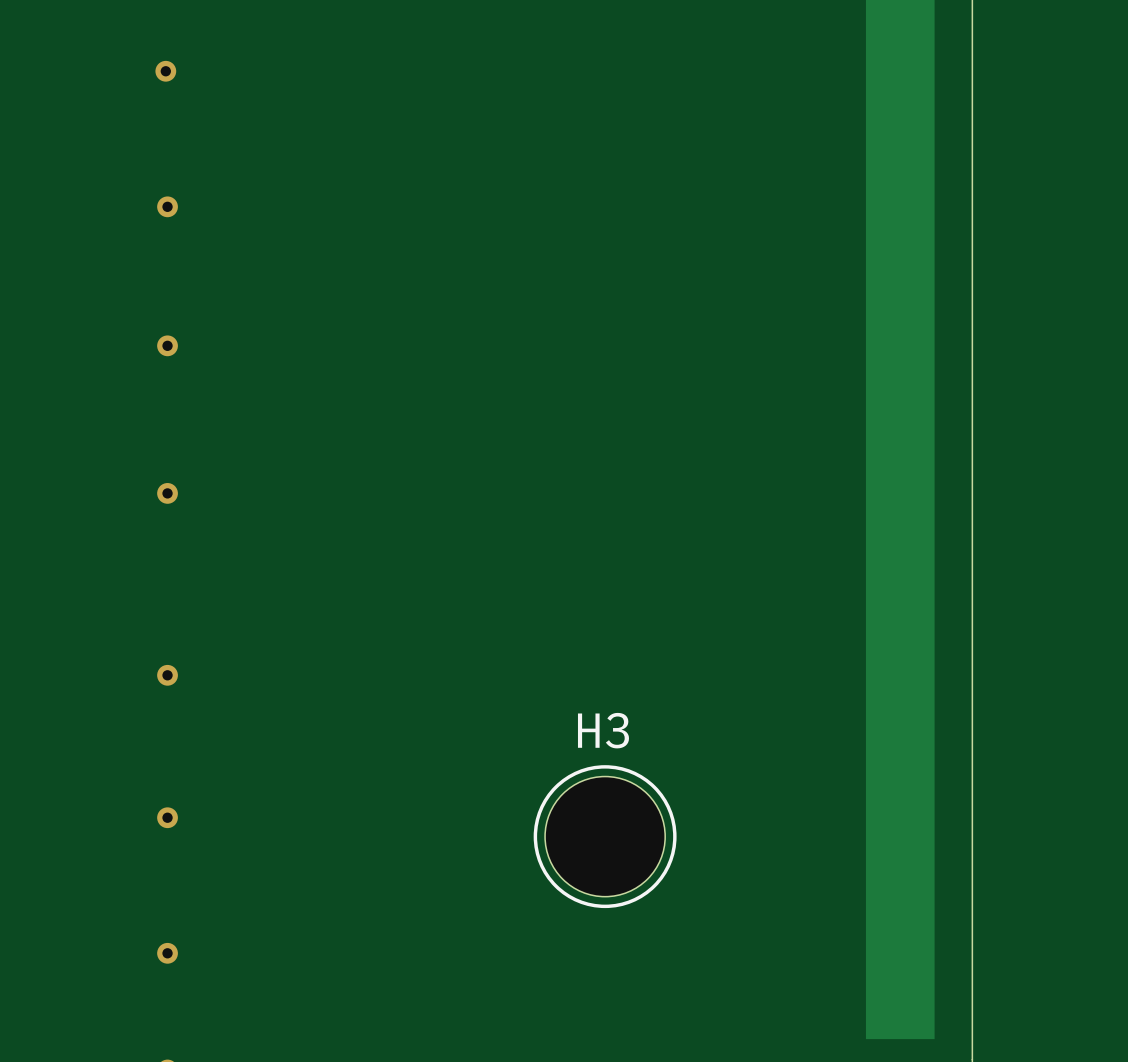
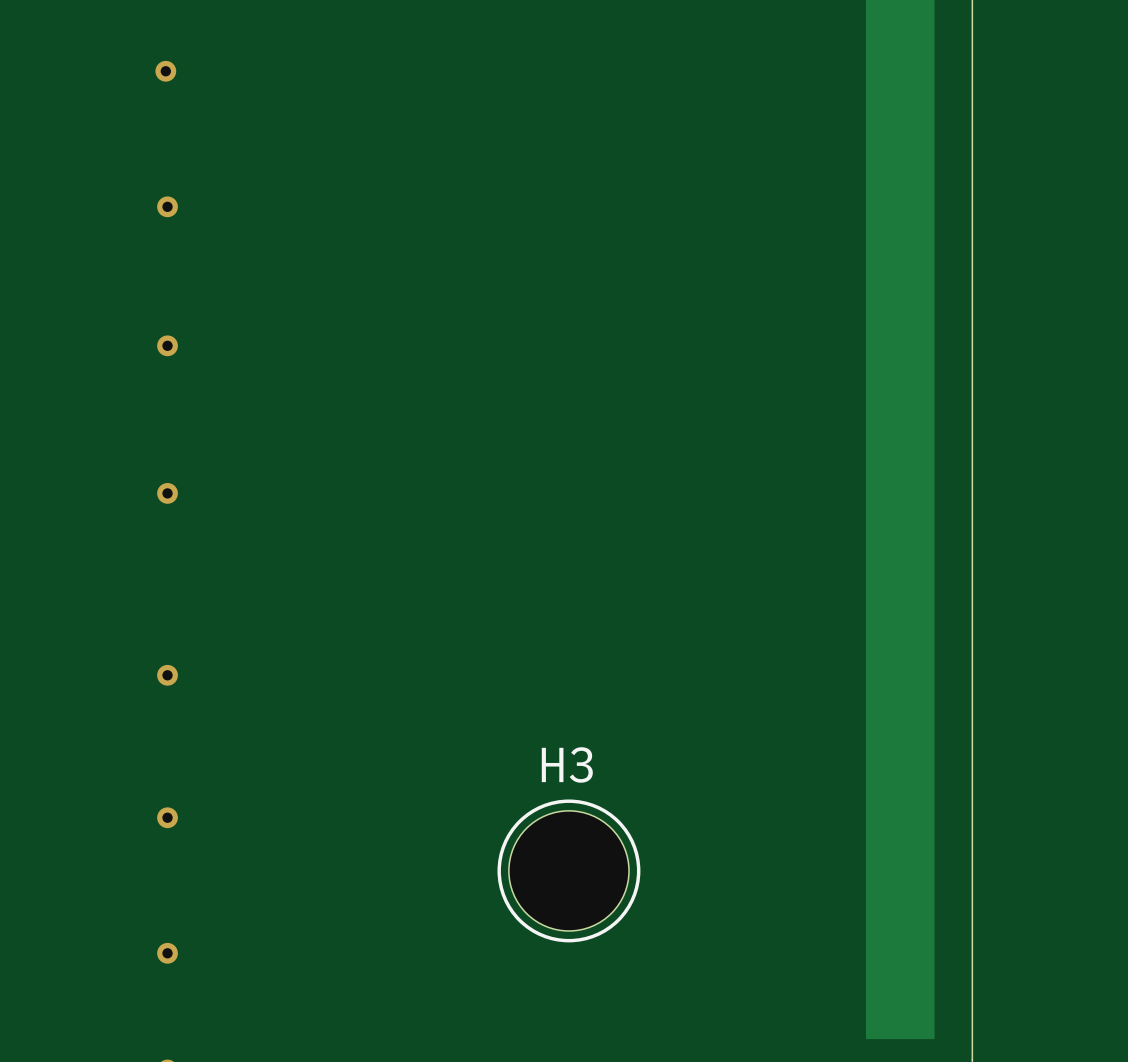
H3 position: (605, 836) -> (568, 870)

